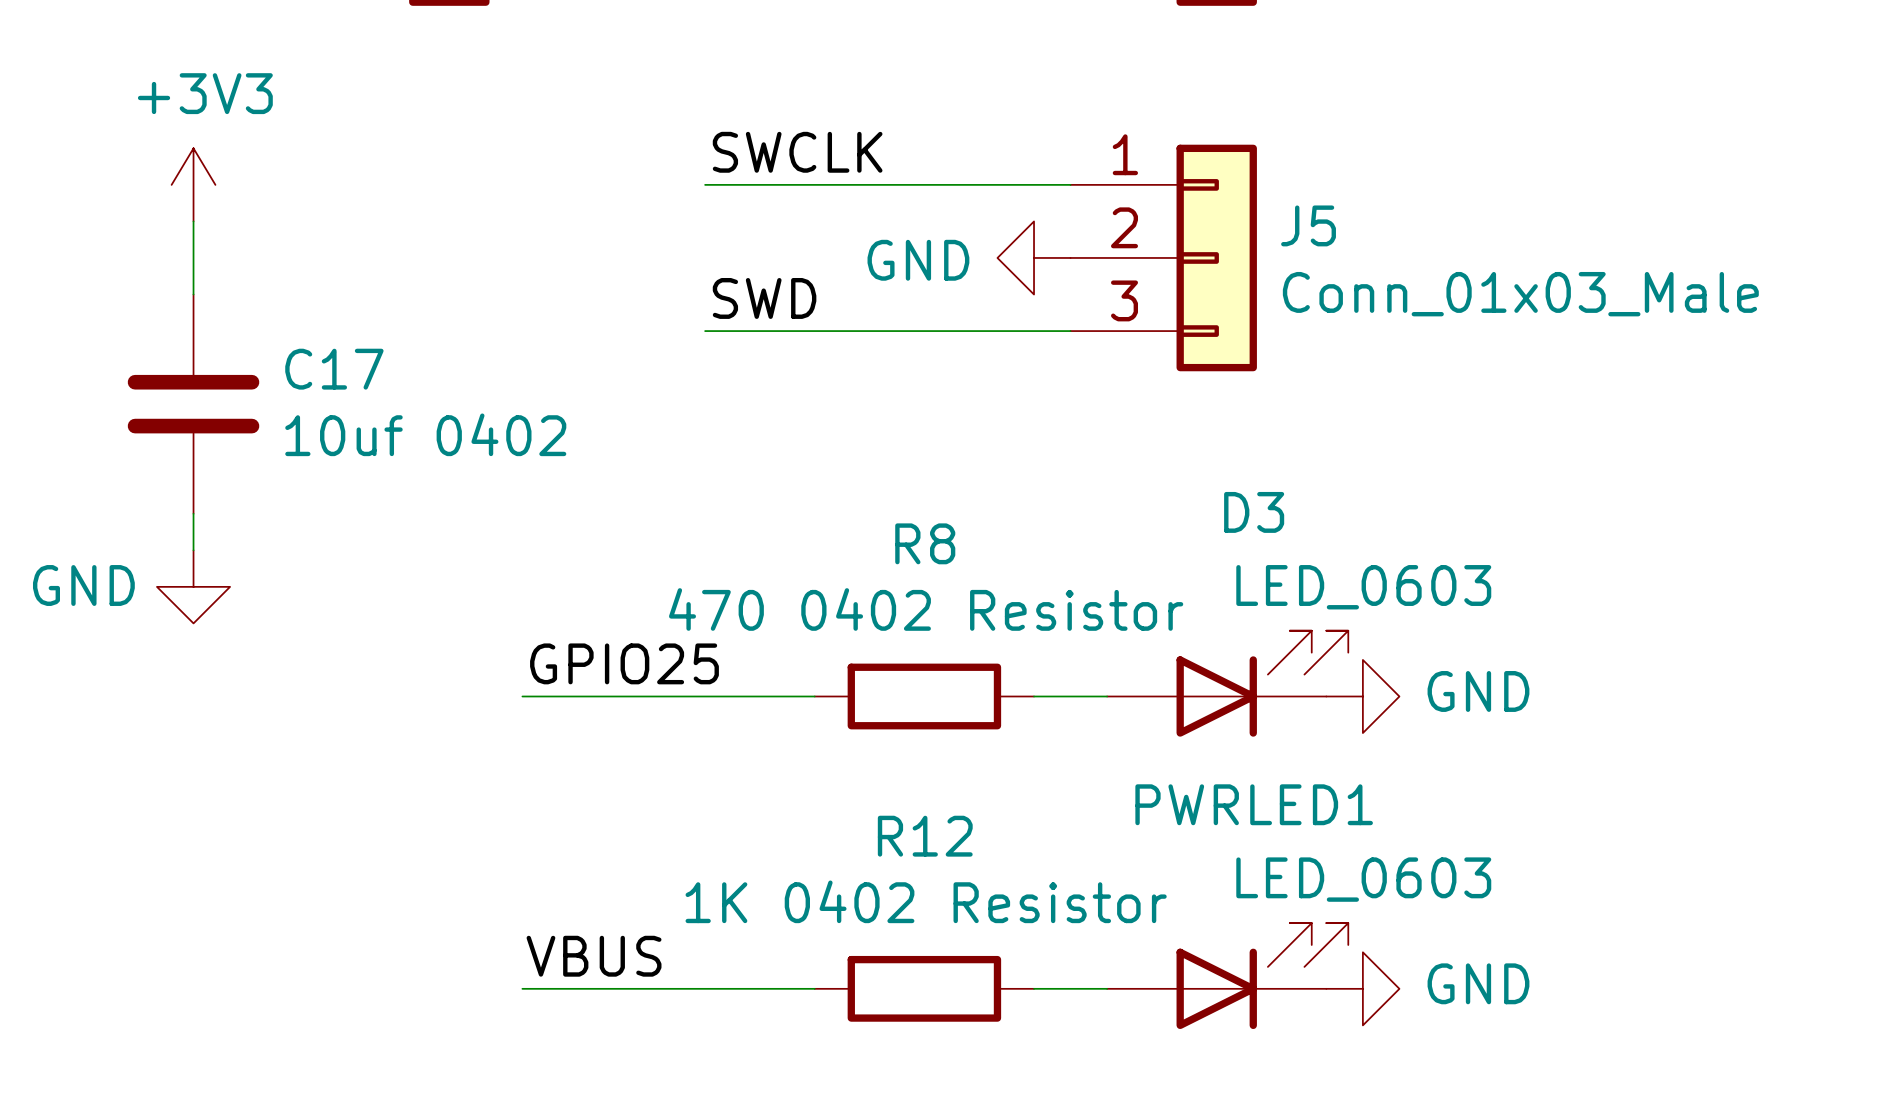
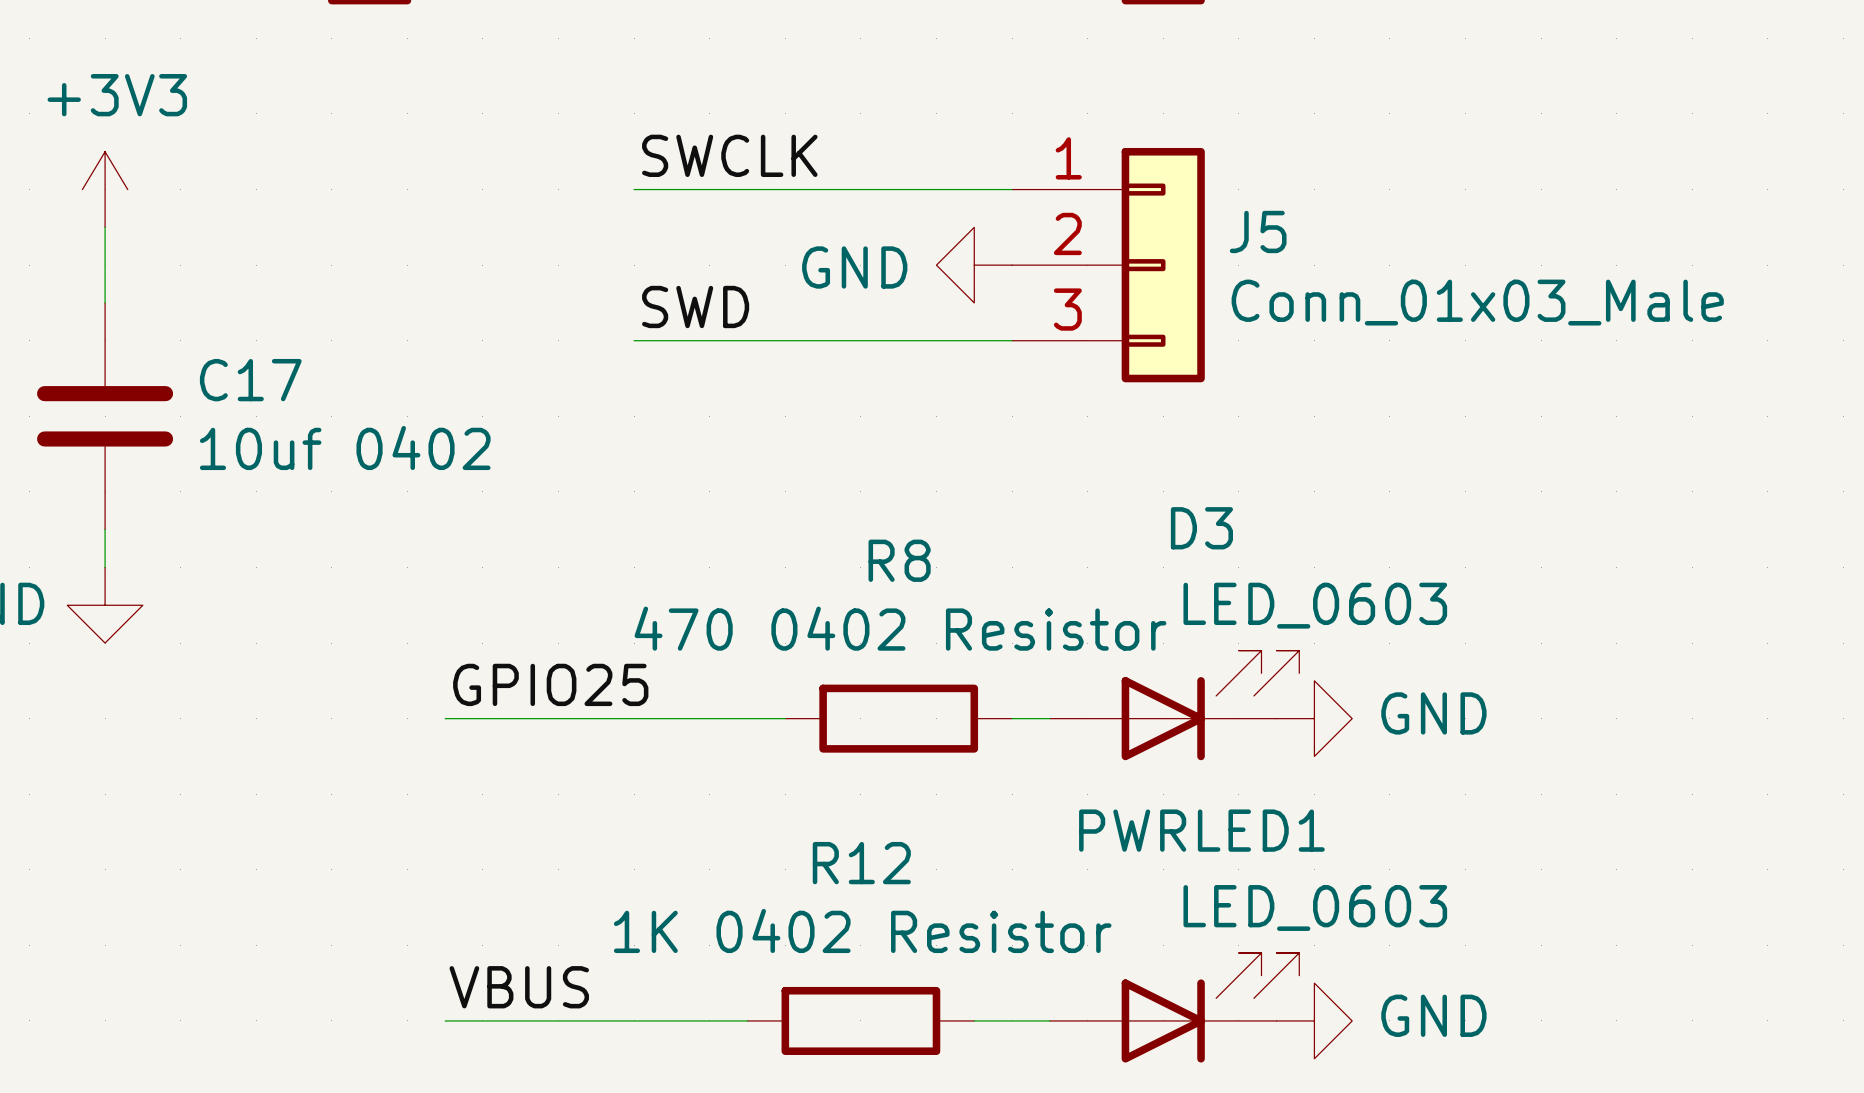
R8 position: (924, 696) -> (898, 718)

